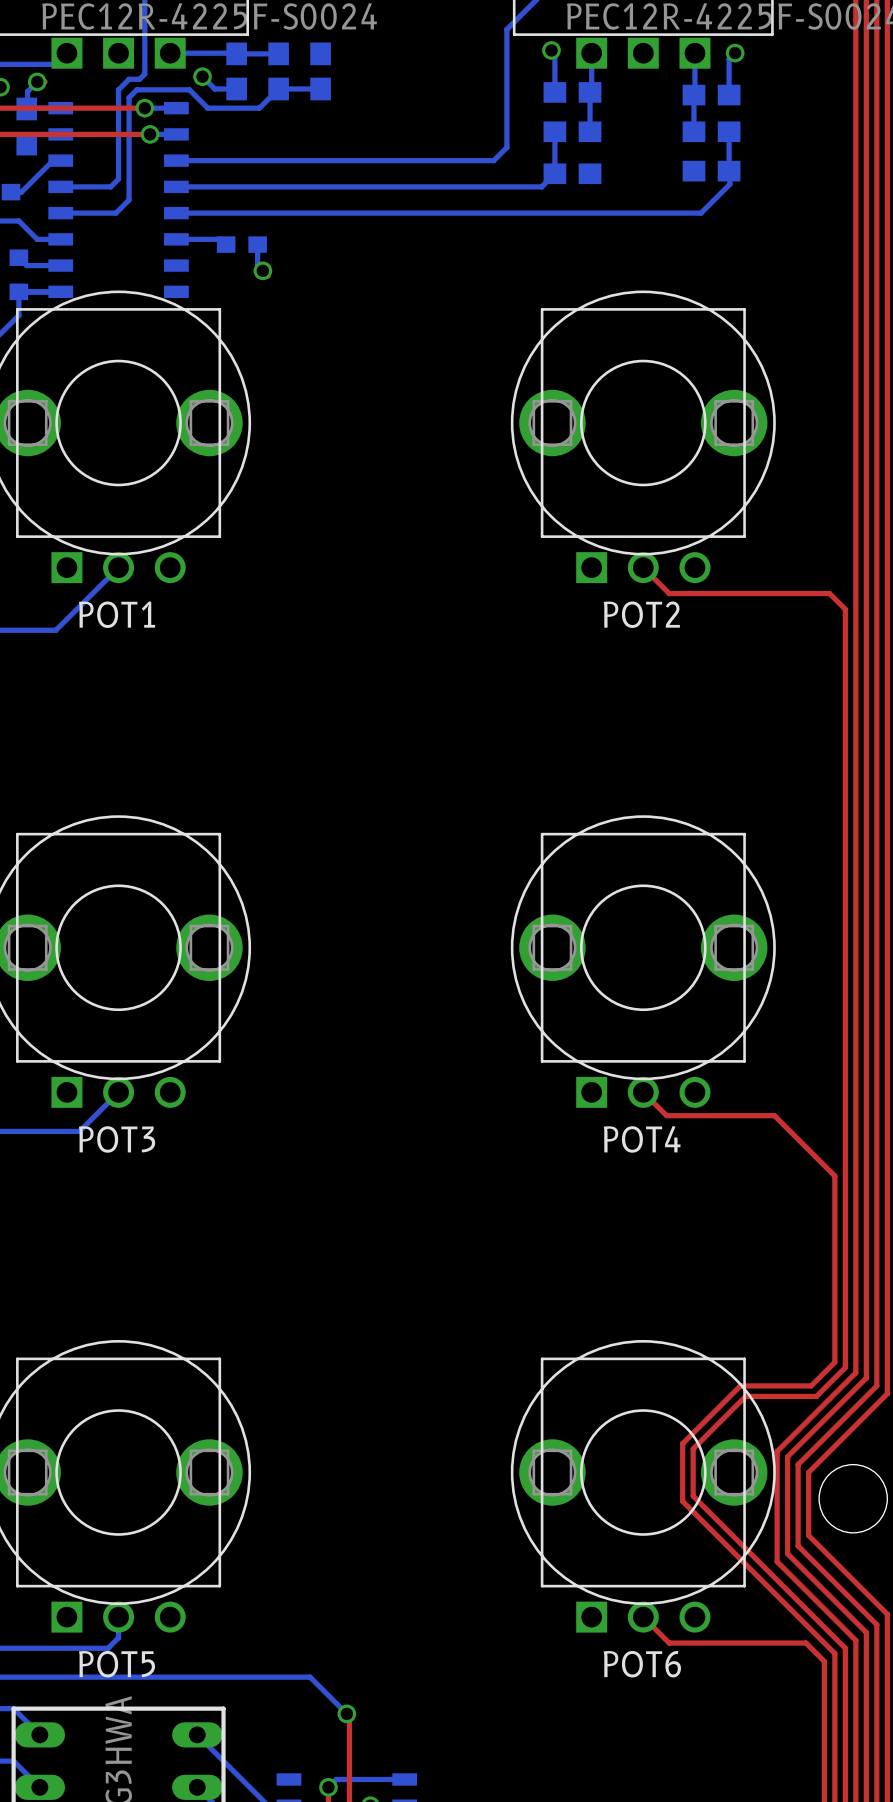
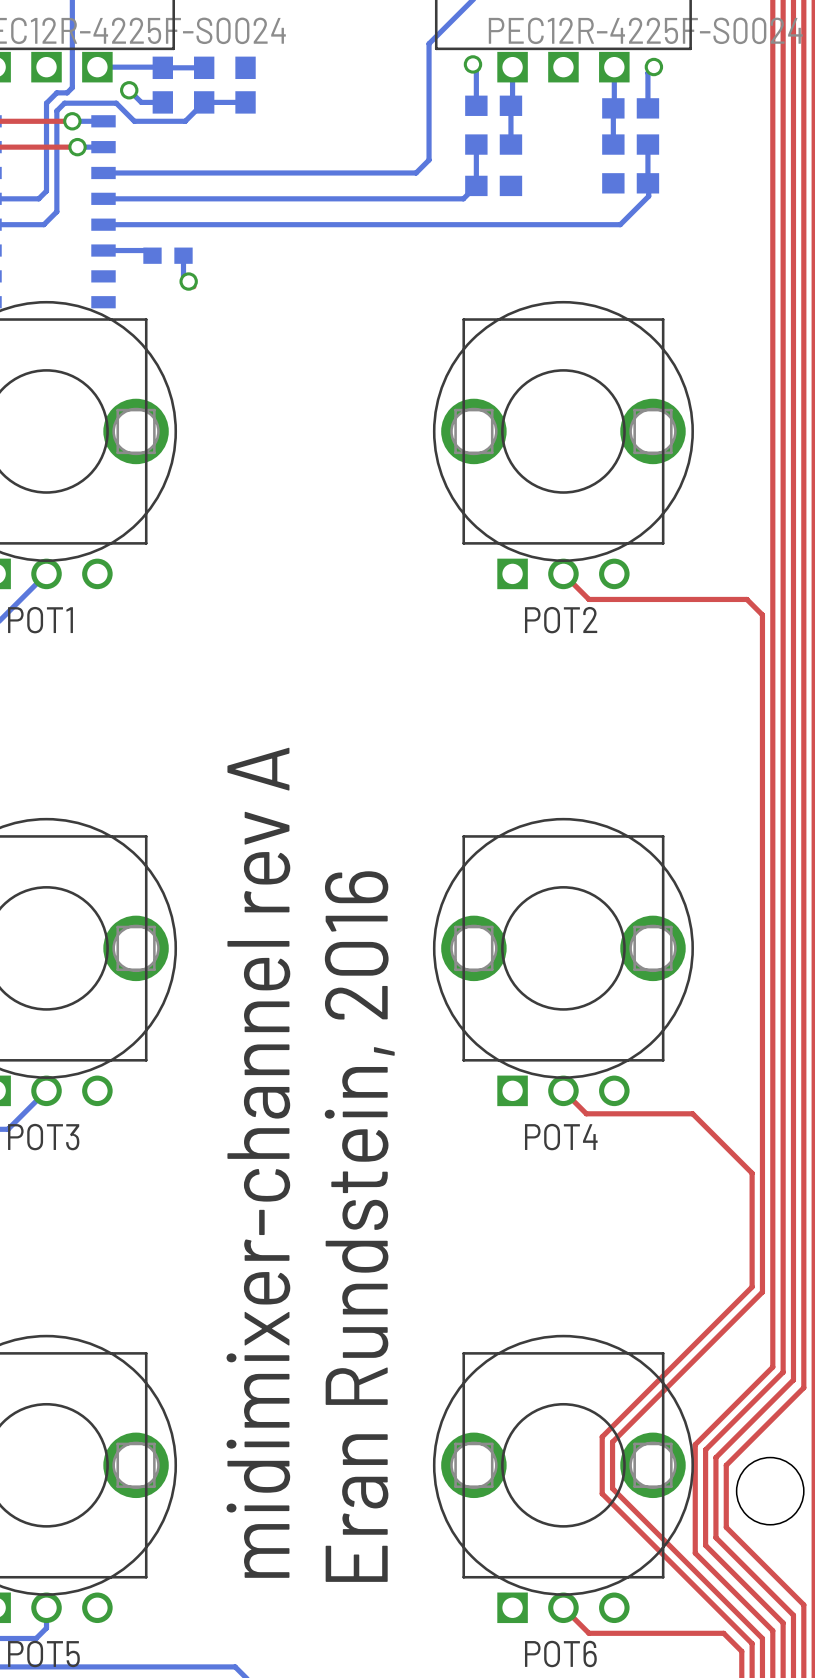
text: none -> midimixer-channel rev A (258, 1162)
text: none -> Eran Rundstein, 2016 (359, 1226)
top track: (834, 1291) (834, 1362) (811, 1385) (740, 1385) -> (752, 1286) (659, 1380)
top track: (845, 1296) (845, 1367) (816, 1396) (745, 1396) -> (762, 1292) (664, 1390)

